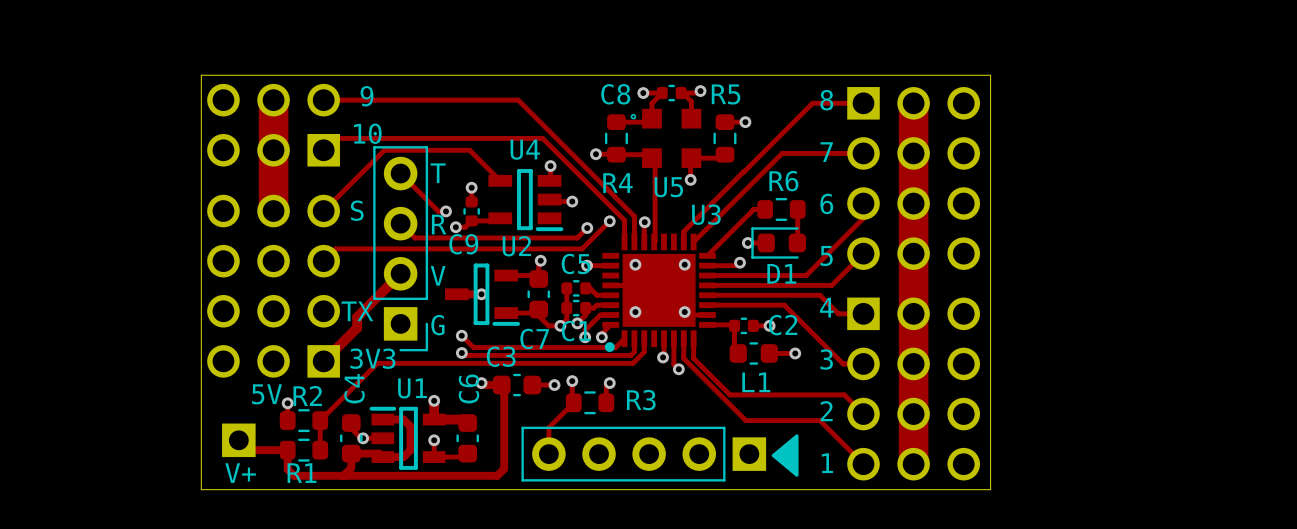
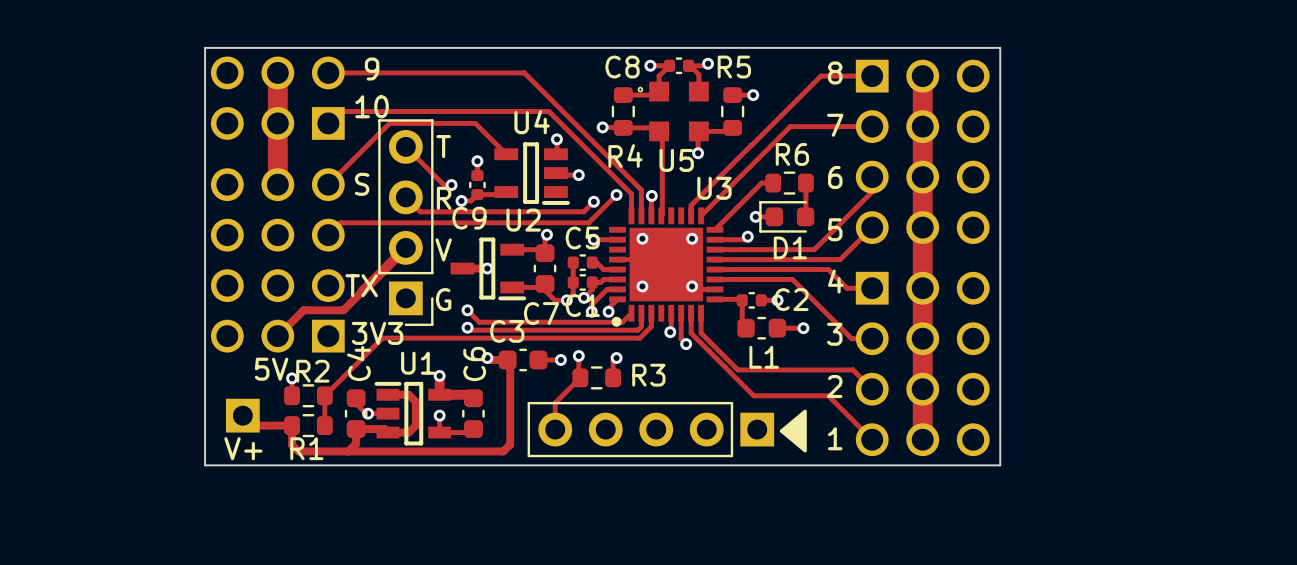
track width: thick (273, 100) (273, 211) -> thin (277, 72) (277, 184)
track width: thick (913, 103) (913, 464) -> thin (922, 76) (922, 439)
track: (357, 317) (357, 327) (323, 361) -> (362, 291) (343, 310) (303, 310) (277, 336)

